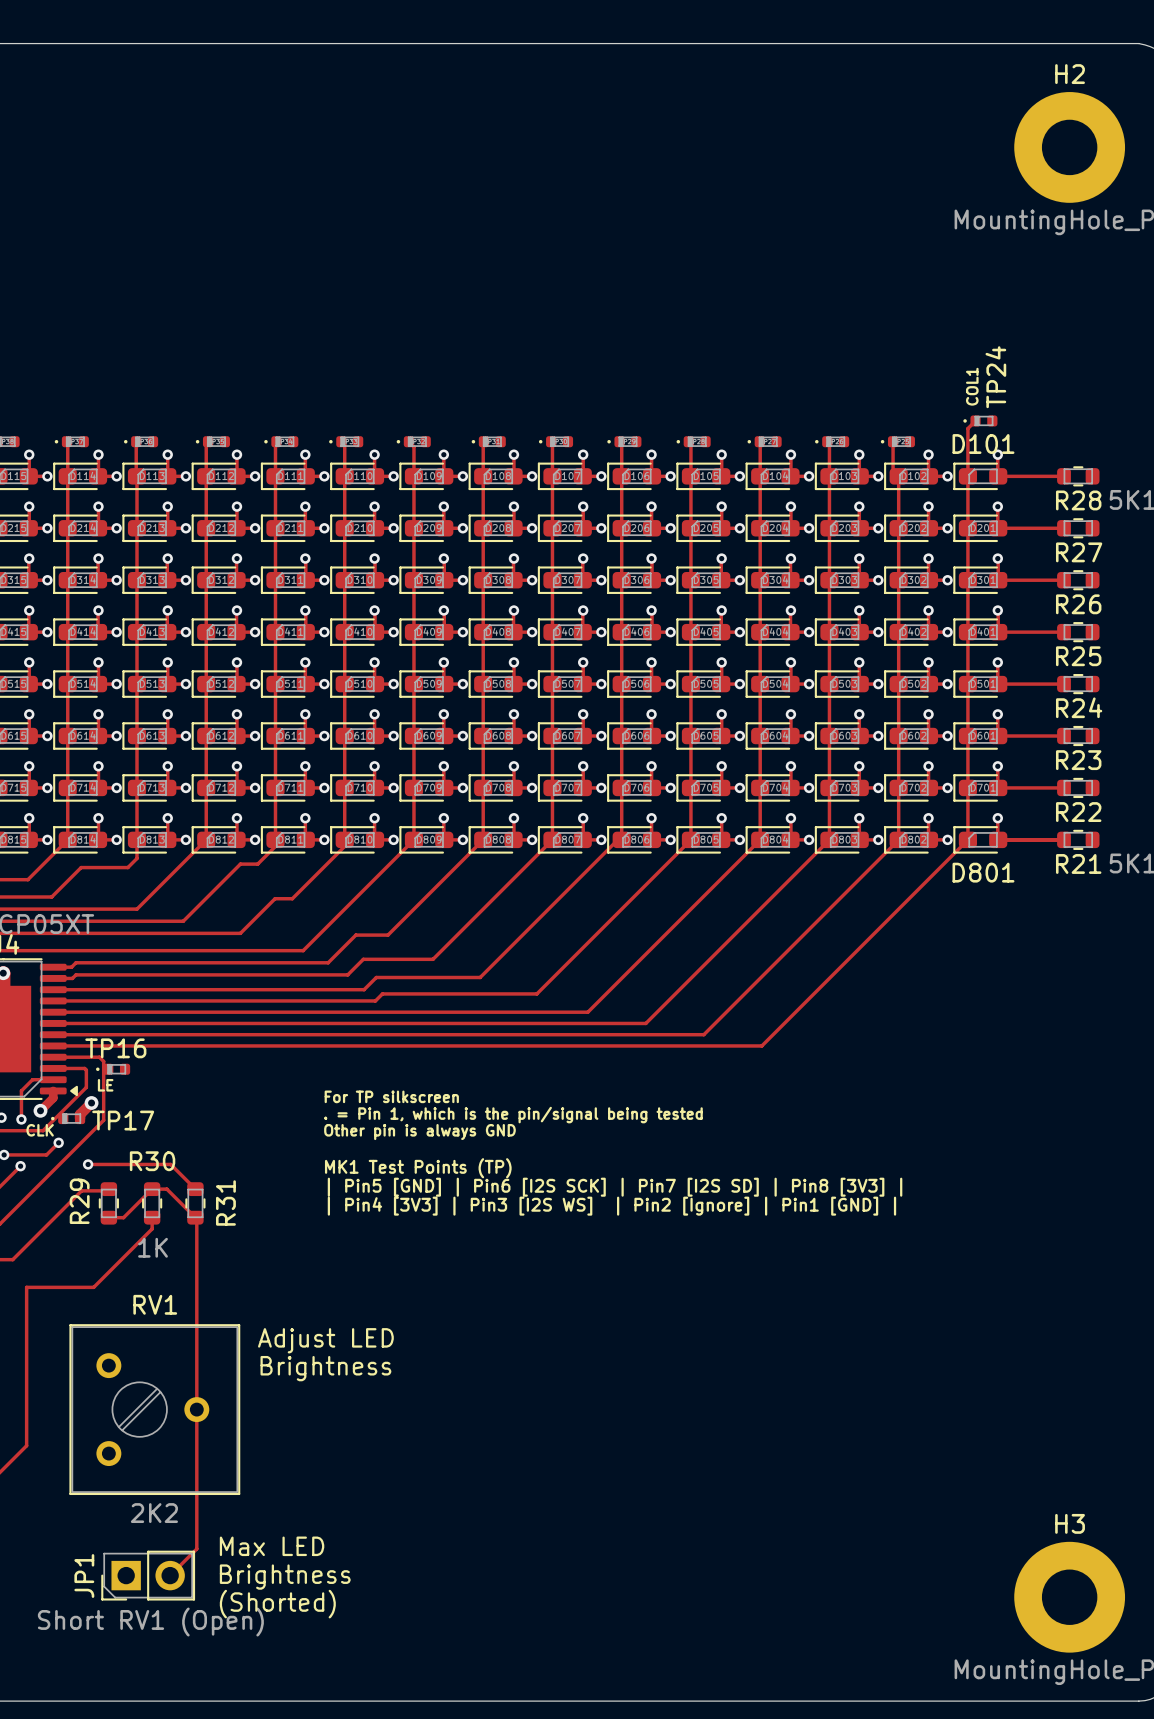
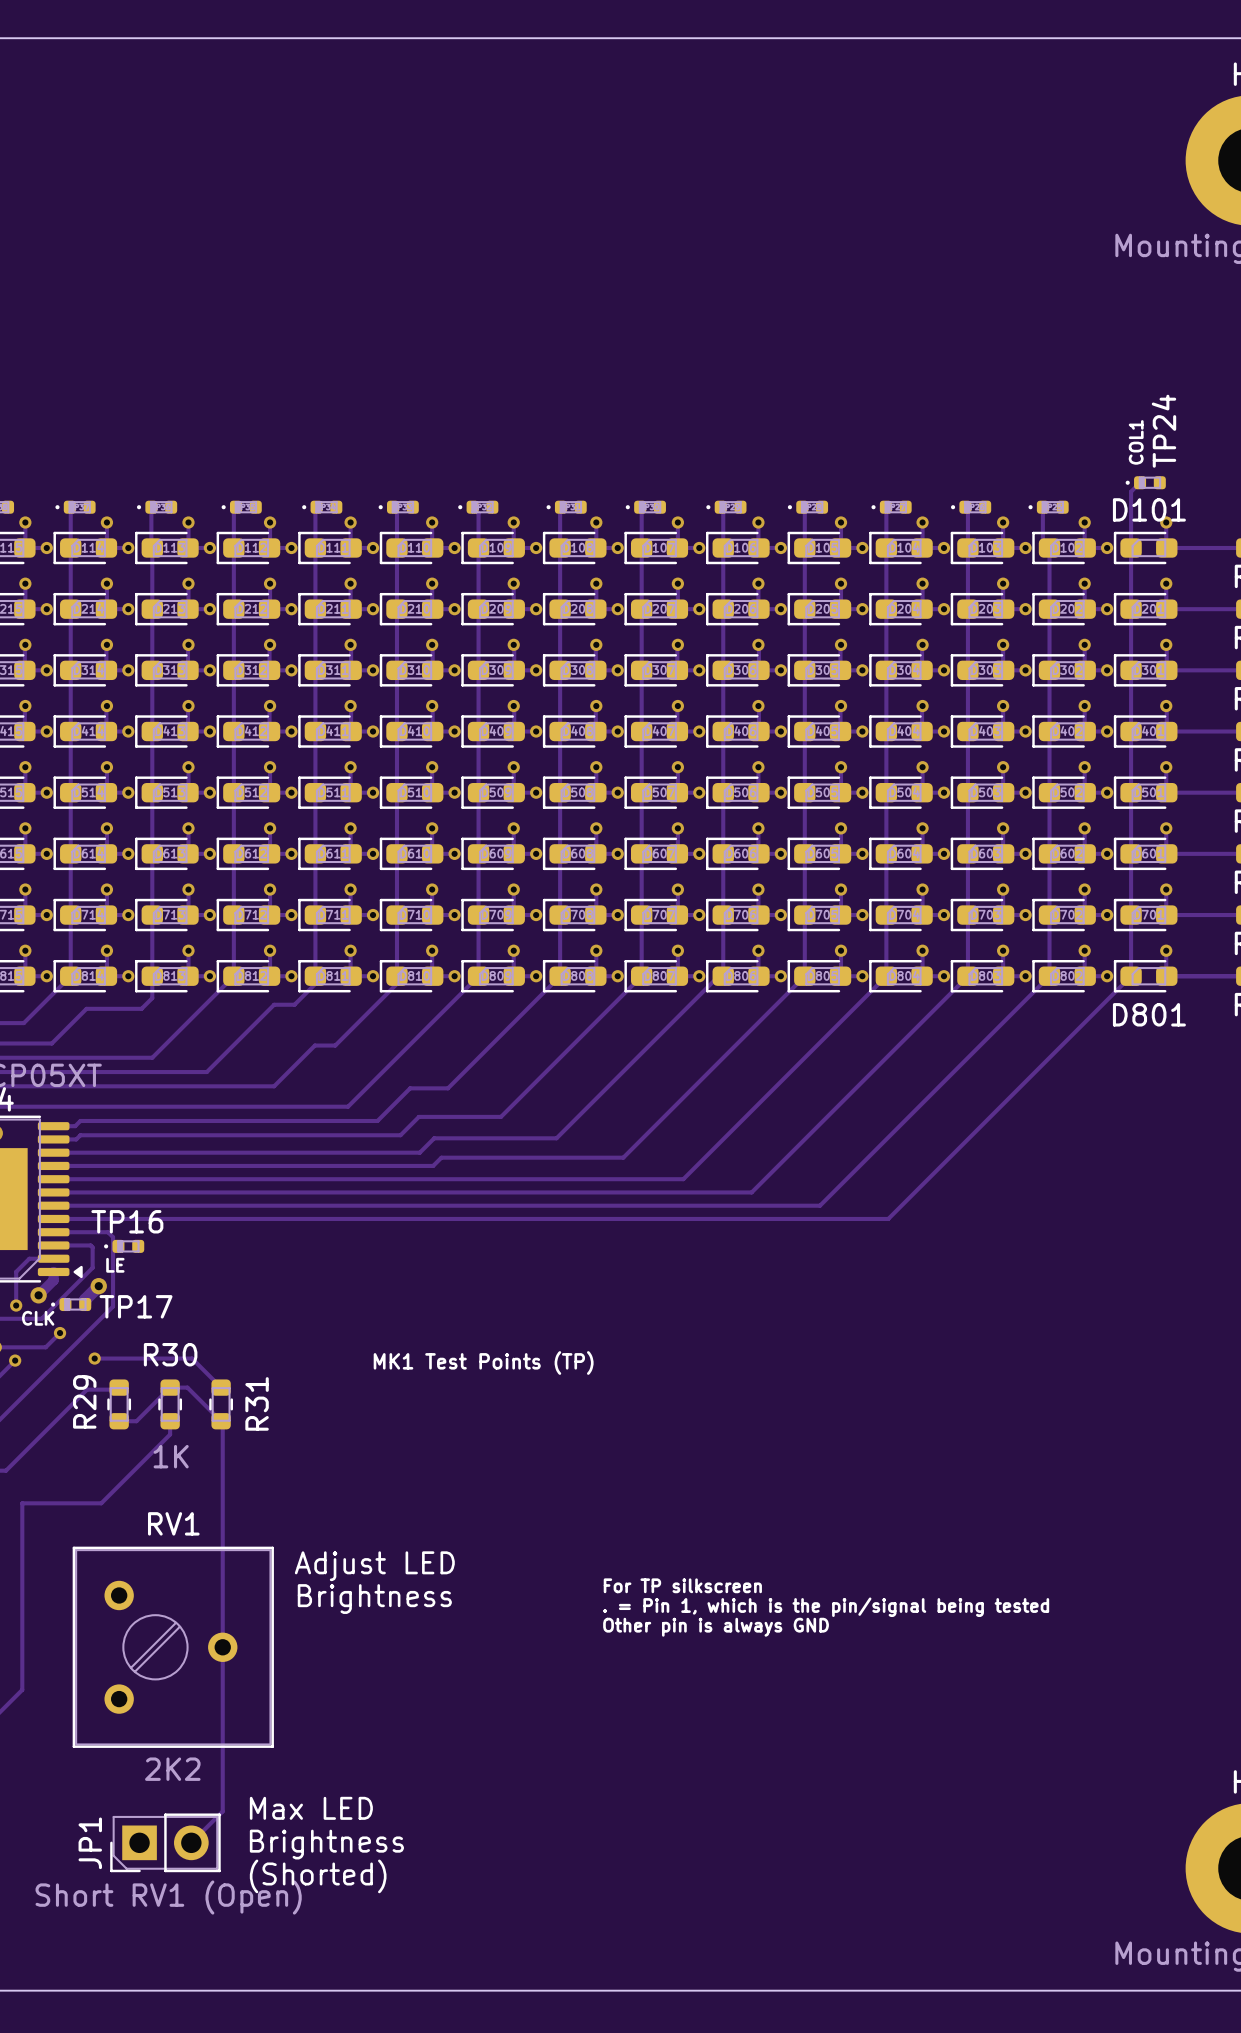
text position: For TP silkscreen (391, 1096) -> For TP silkscreen (682, 1585)
text position: . = Pin 1, which is the pin/signal being tested (513, 1115) -> . = Pin 1, which is the pin/signal being tested (826, 1607)
text position: Other pin is always GND (419, 1132) -> Other pin is always GND (716, 1627)
text: | Pin5 [GND] | Pin6 [I2S SCK] | Pin7 [I2S SD] | Pin8 [3V3] | (615, 1187) -> none
text: | Pin4 [3V3] | Pin3 [I2S WS] | Pin2 [Ignore] | Pin1 [GND] | (611, 1206) -> none

